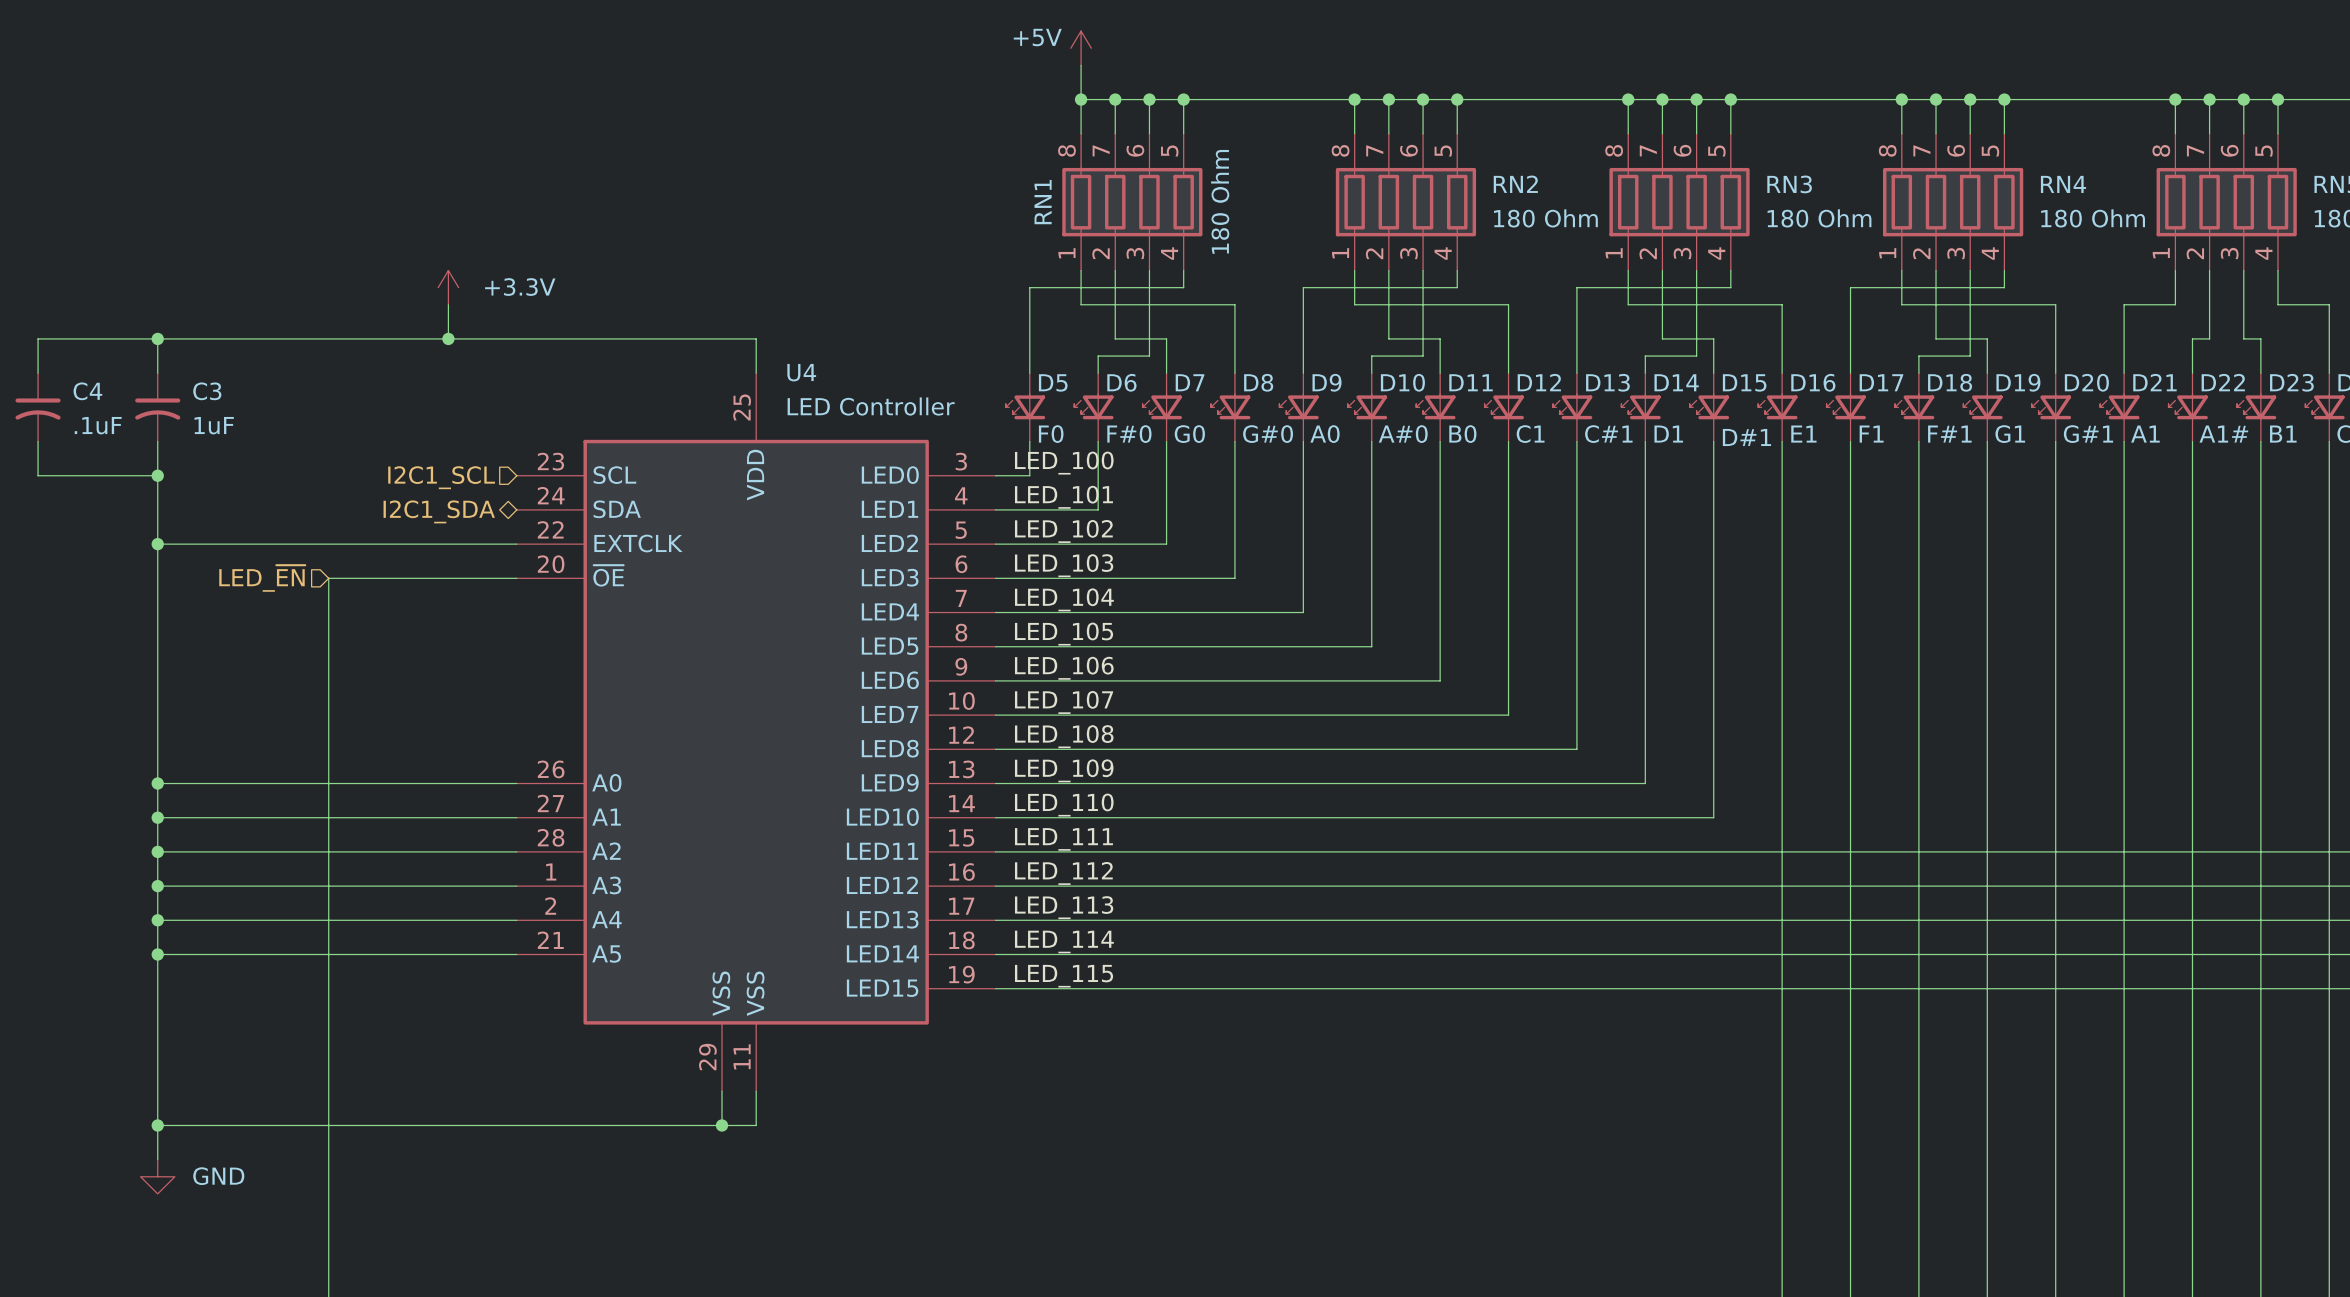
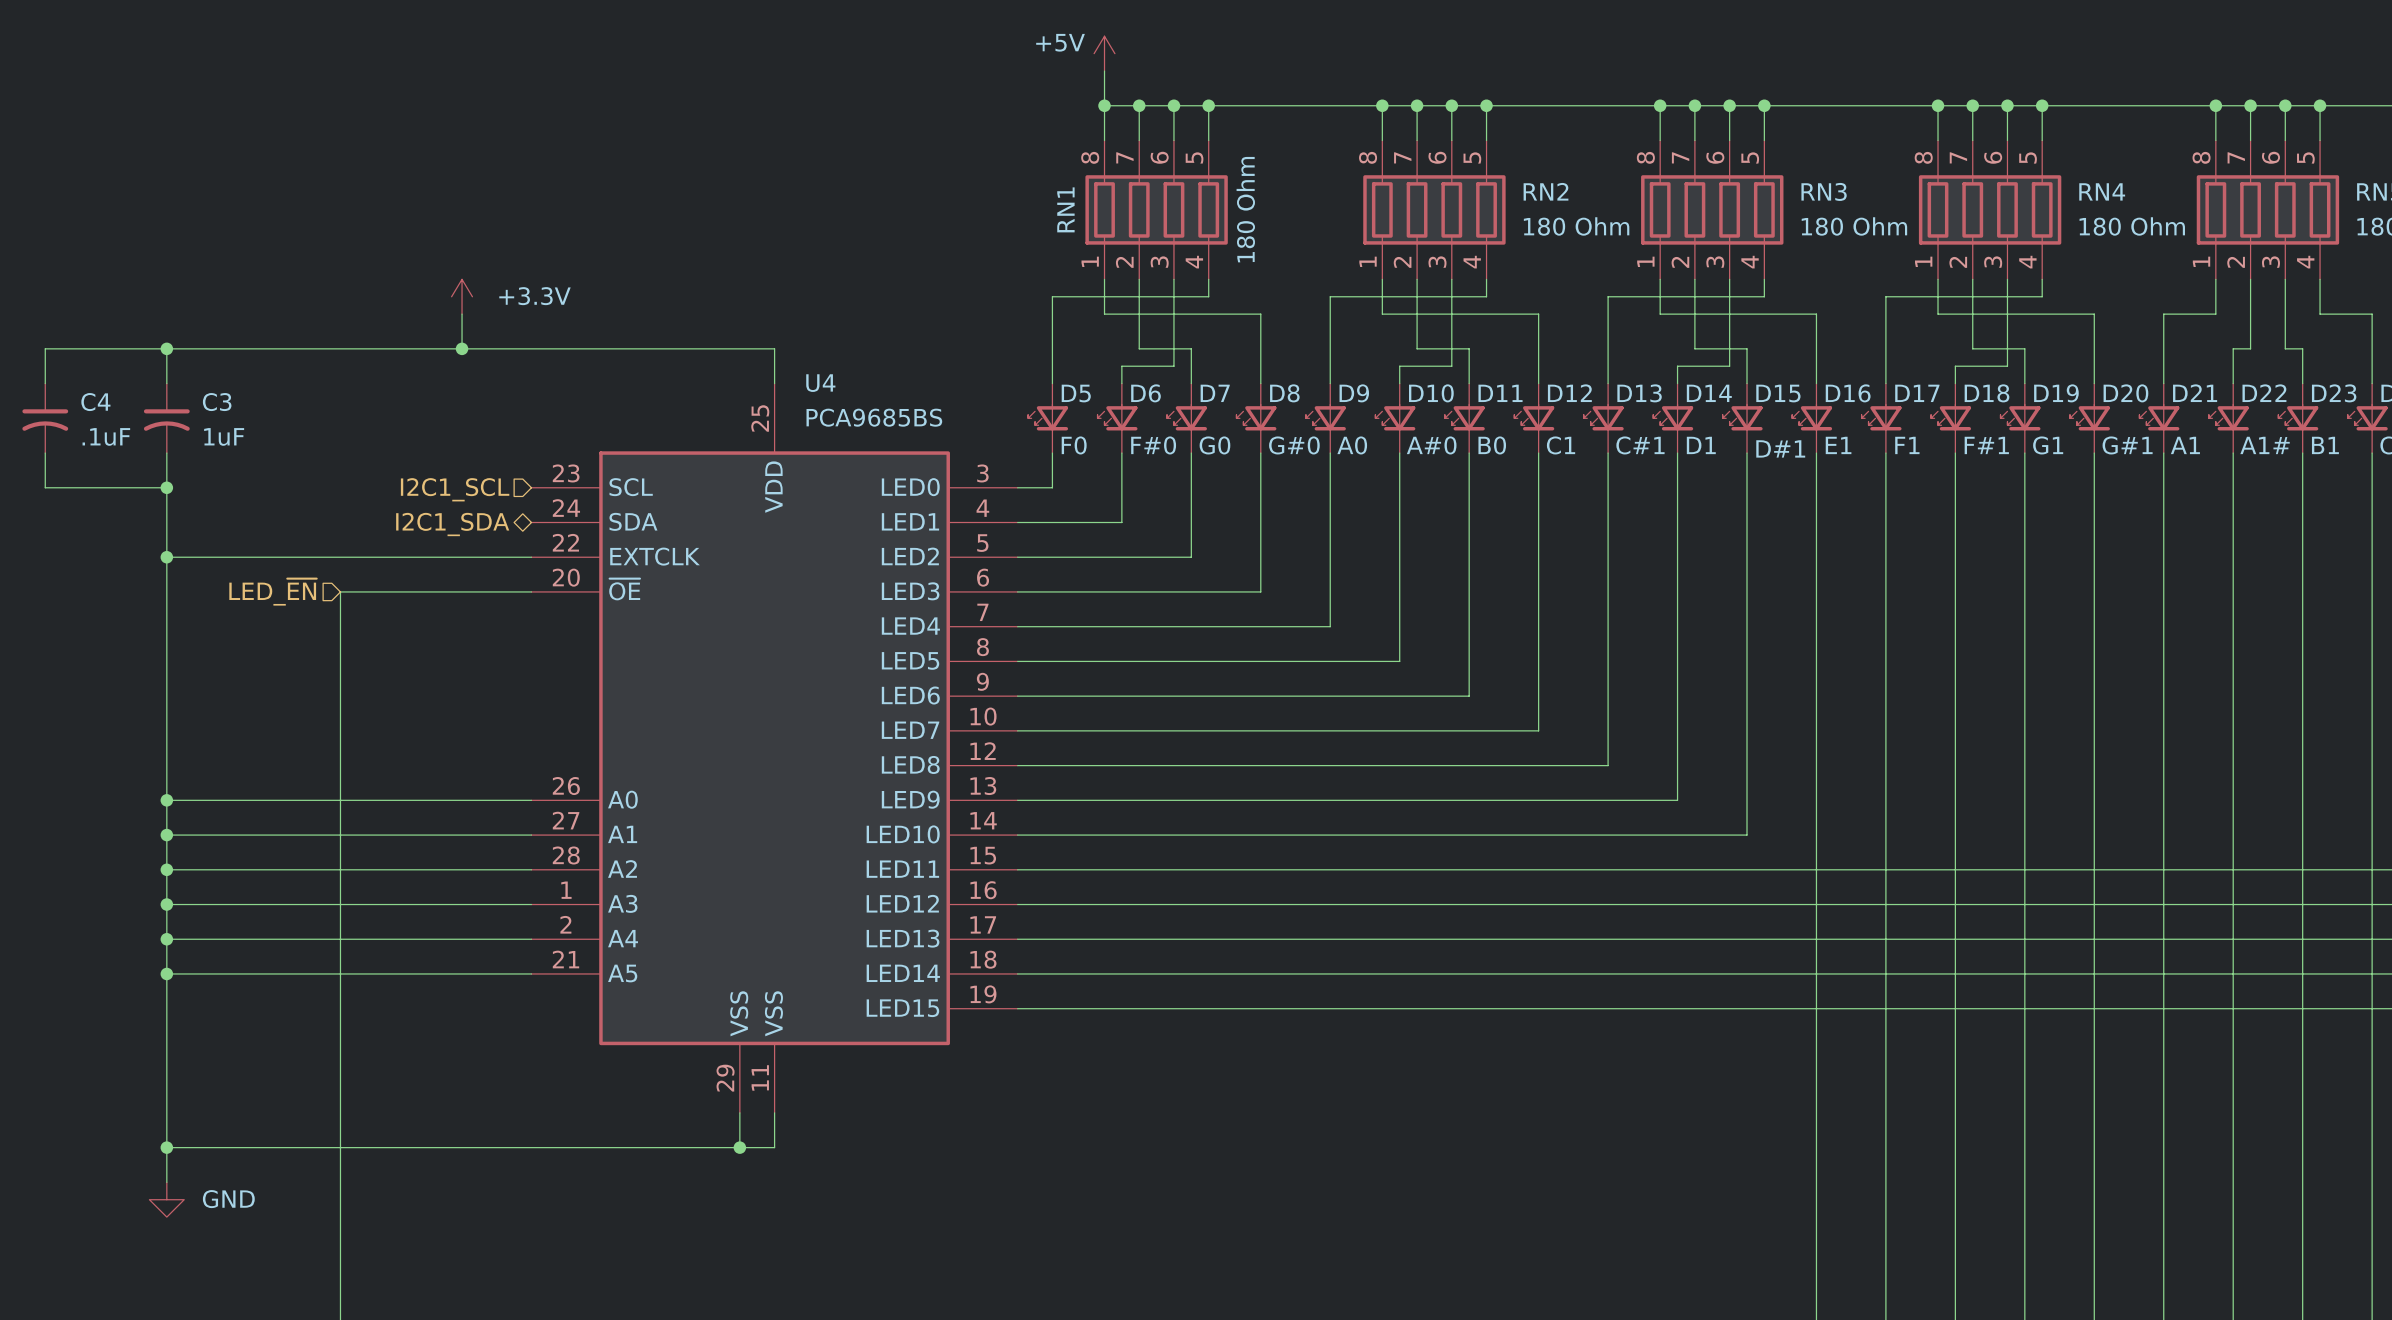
U4 value: LED Controller (871, 406) -> PCA9685BS (874, 417)
label: LED_100 (1064, 463) -> none
label: LED_101 (1063, 497) -> none
label: LED_102 (1063, 531) -> none
label: LED_103 (1064, 565) -> none
label: LED_104 (1064, 599) -> none
label: LED_105 (1064, 634) -> none
label: LED_106 (1064, 668) -> none
label: LED_107 (1064, 702) -> none
label: LED_108 (1064, 736) -> none
label: LED_109 (1064, 770) -> none
label: LED_110 (1064, 805) -> none
label: LED_111 (1063, 839) -> none
label: LED_112 (1063, 873) -> none
label: LED_113 (1064, 907) -> none
label: LED_114 (1064, 942) -> none
label: LED_115 (1064, 976) -> none

